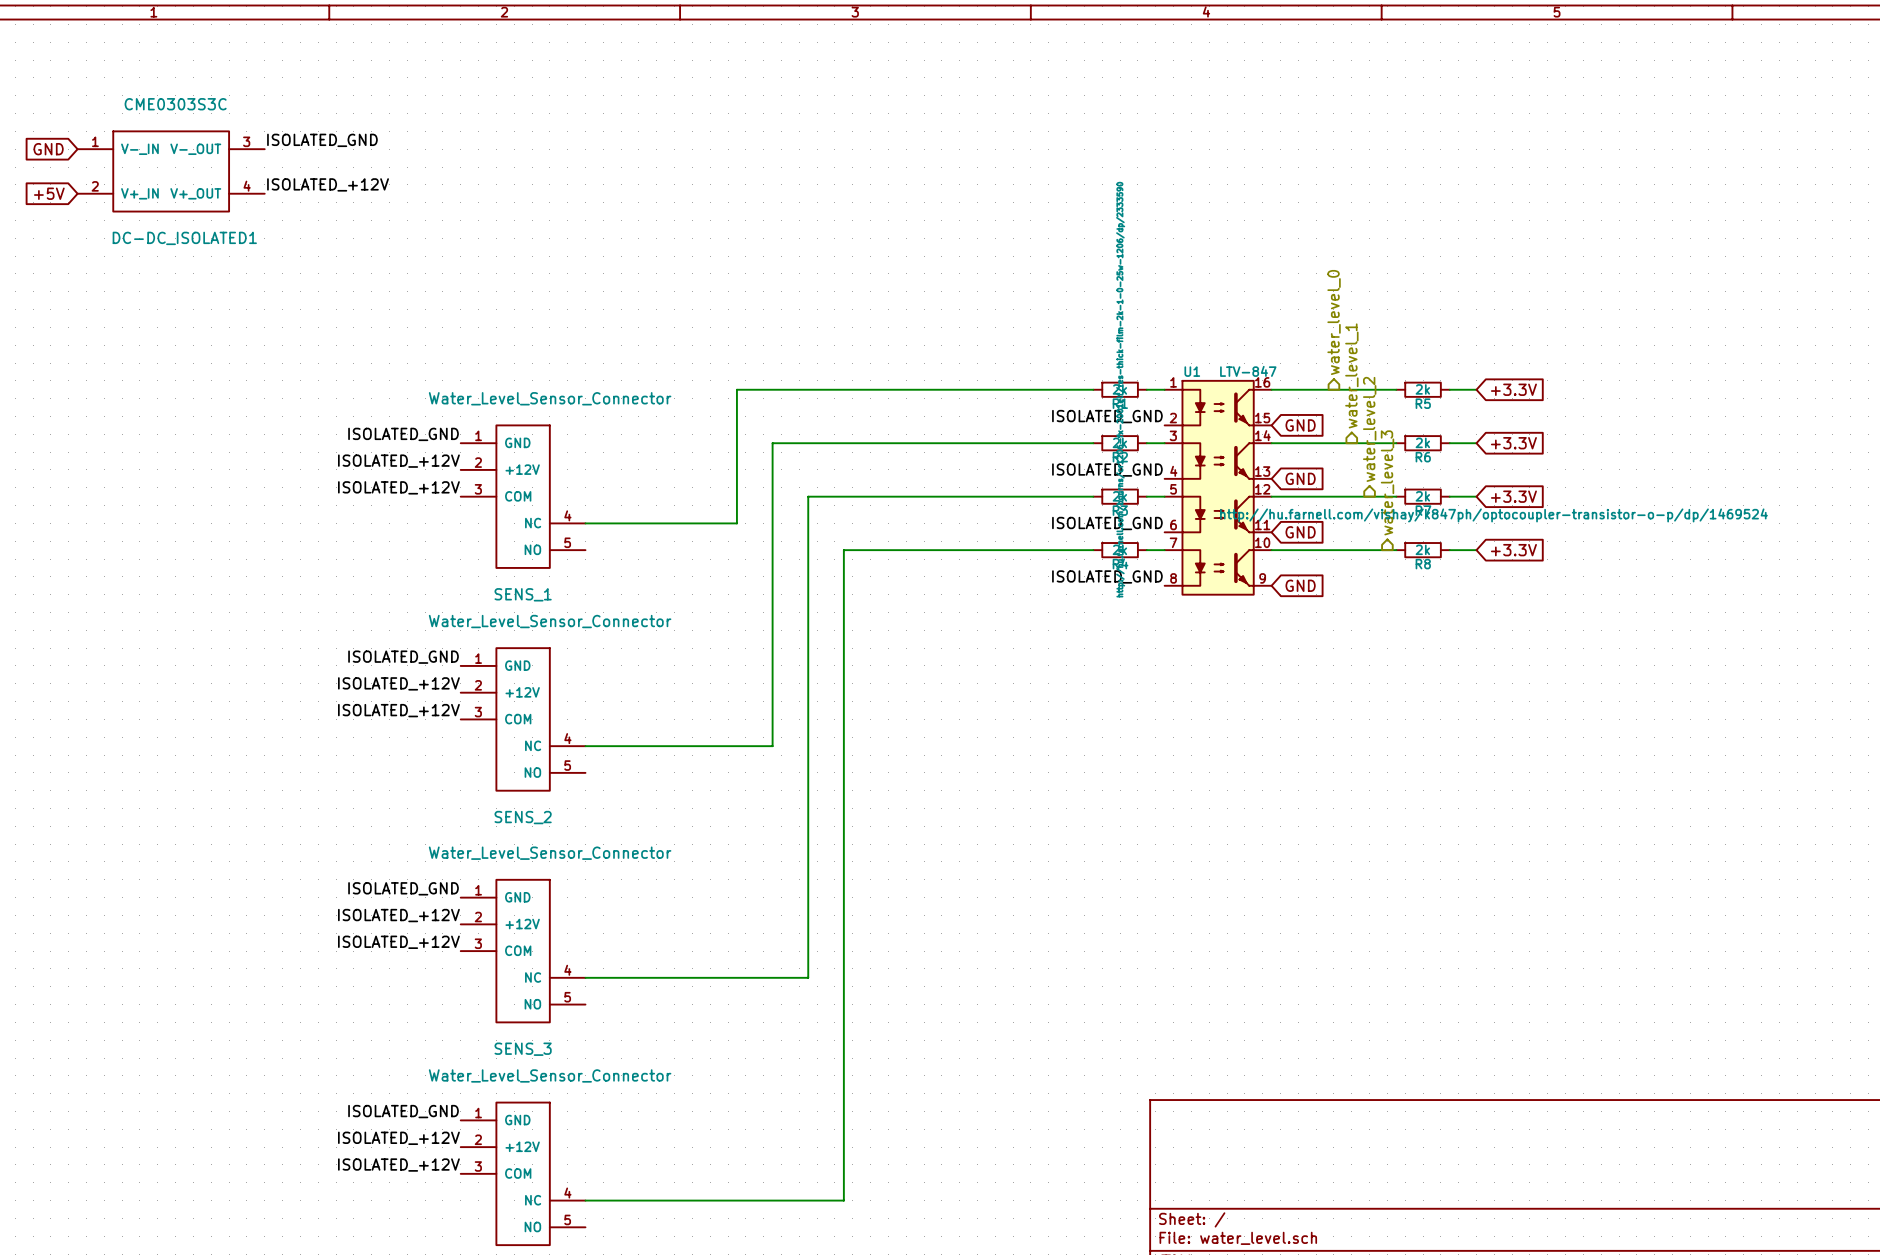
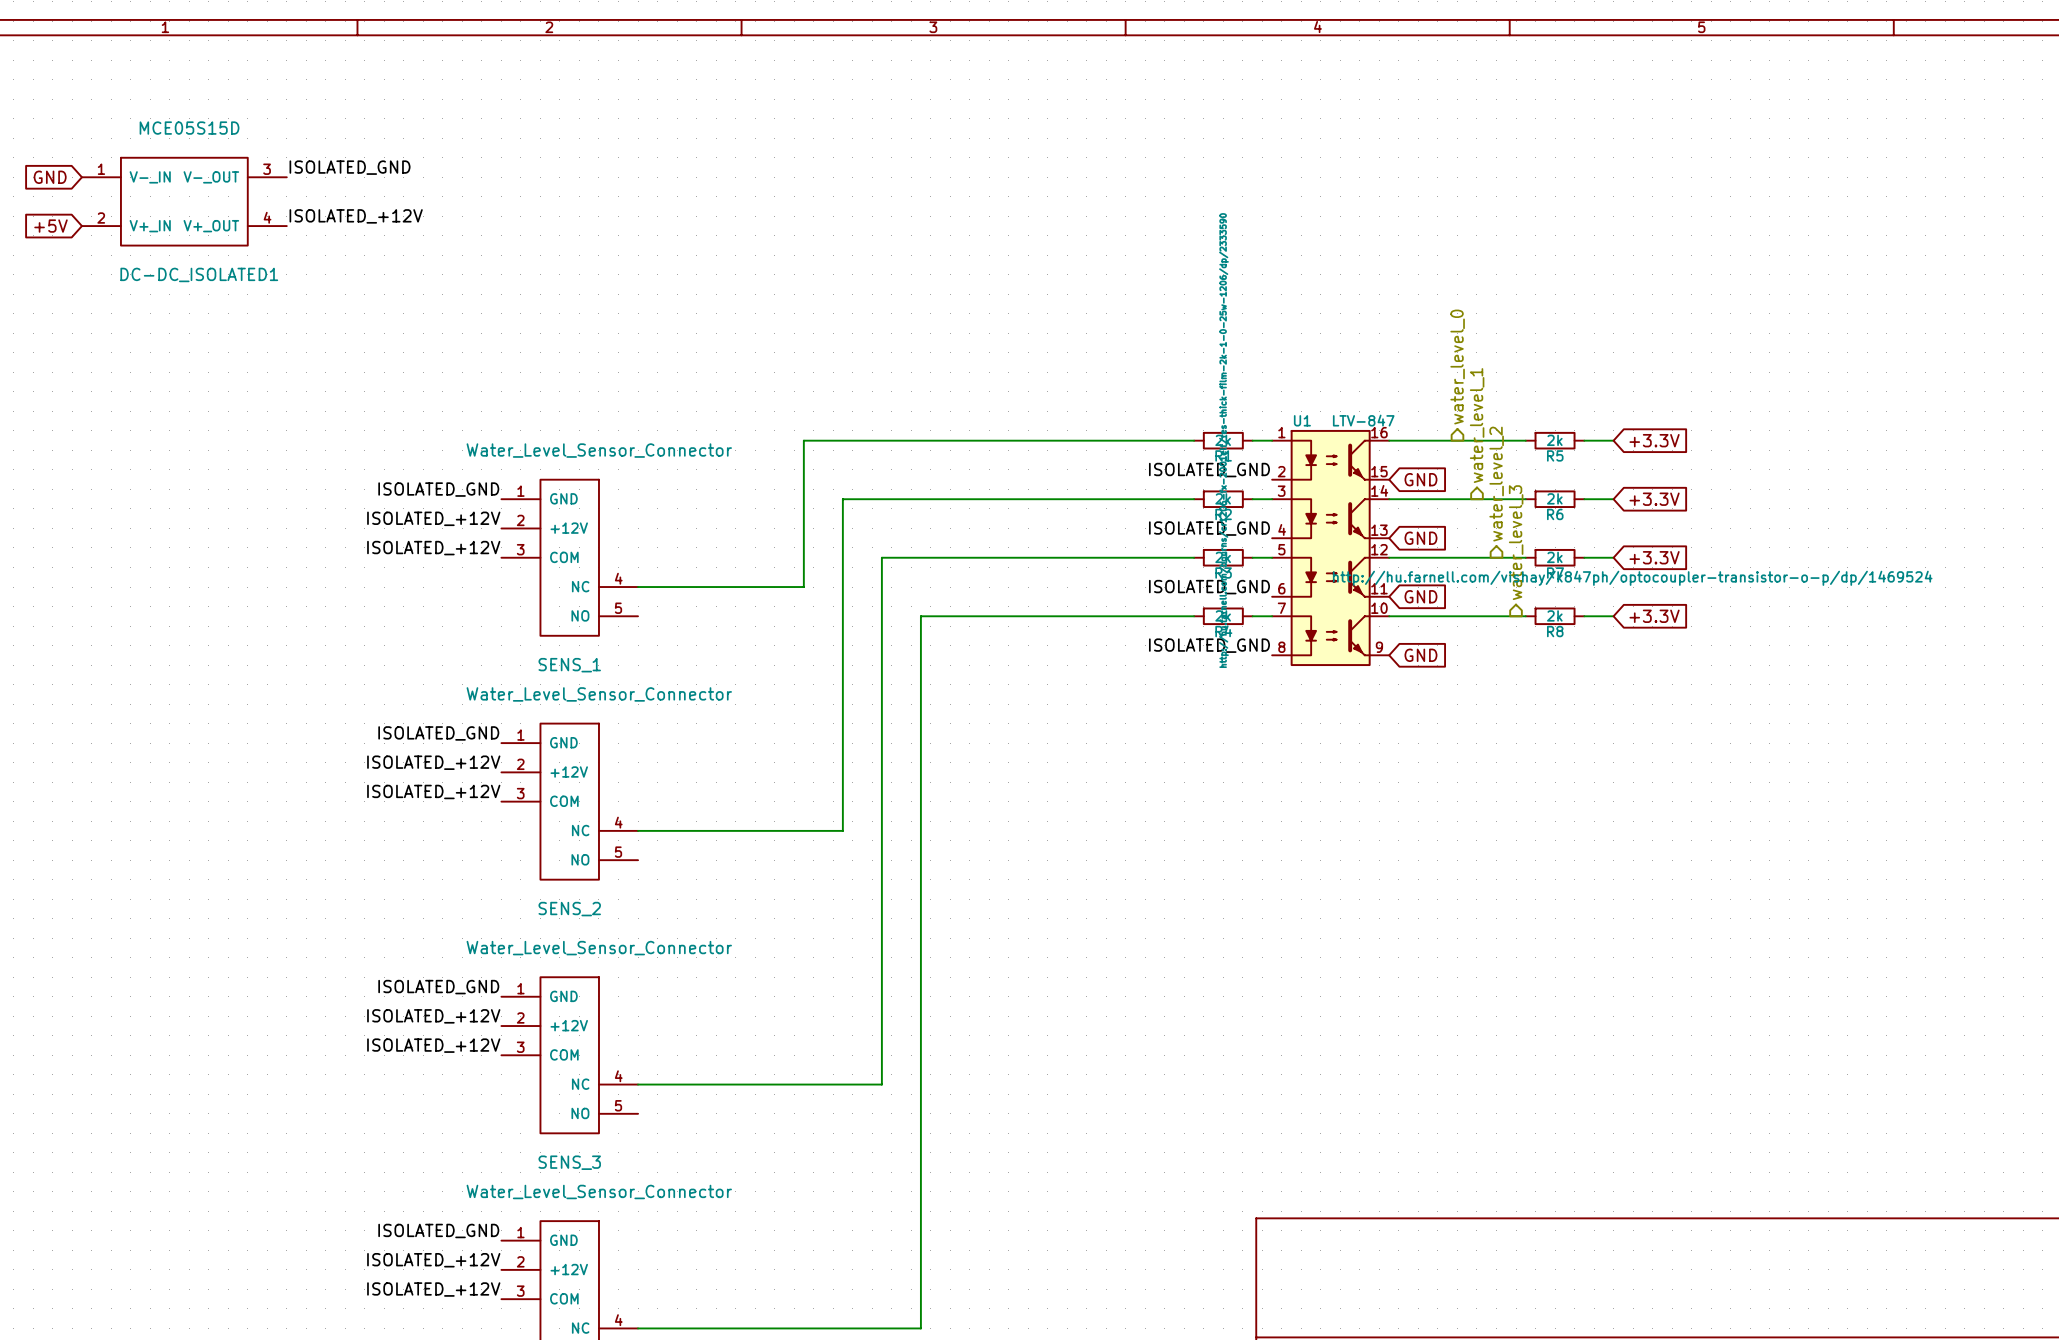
DC-DC_ISOLATED1 value: CME0303S3C (175, 104) -> MCE05S15D (189, 128)

